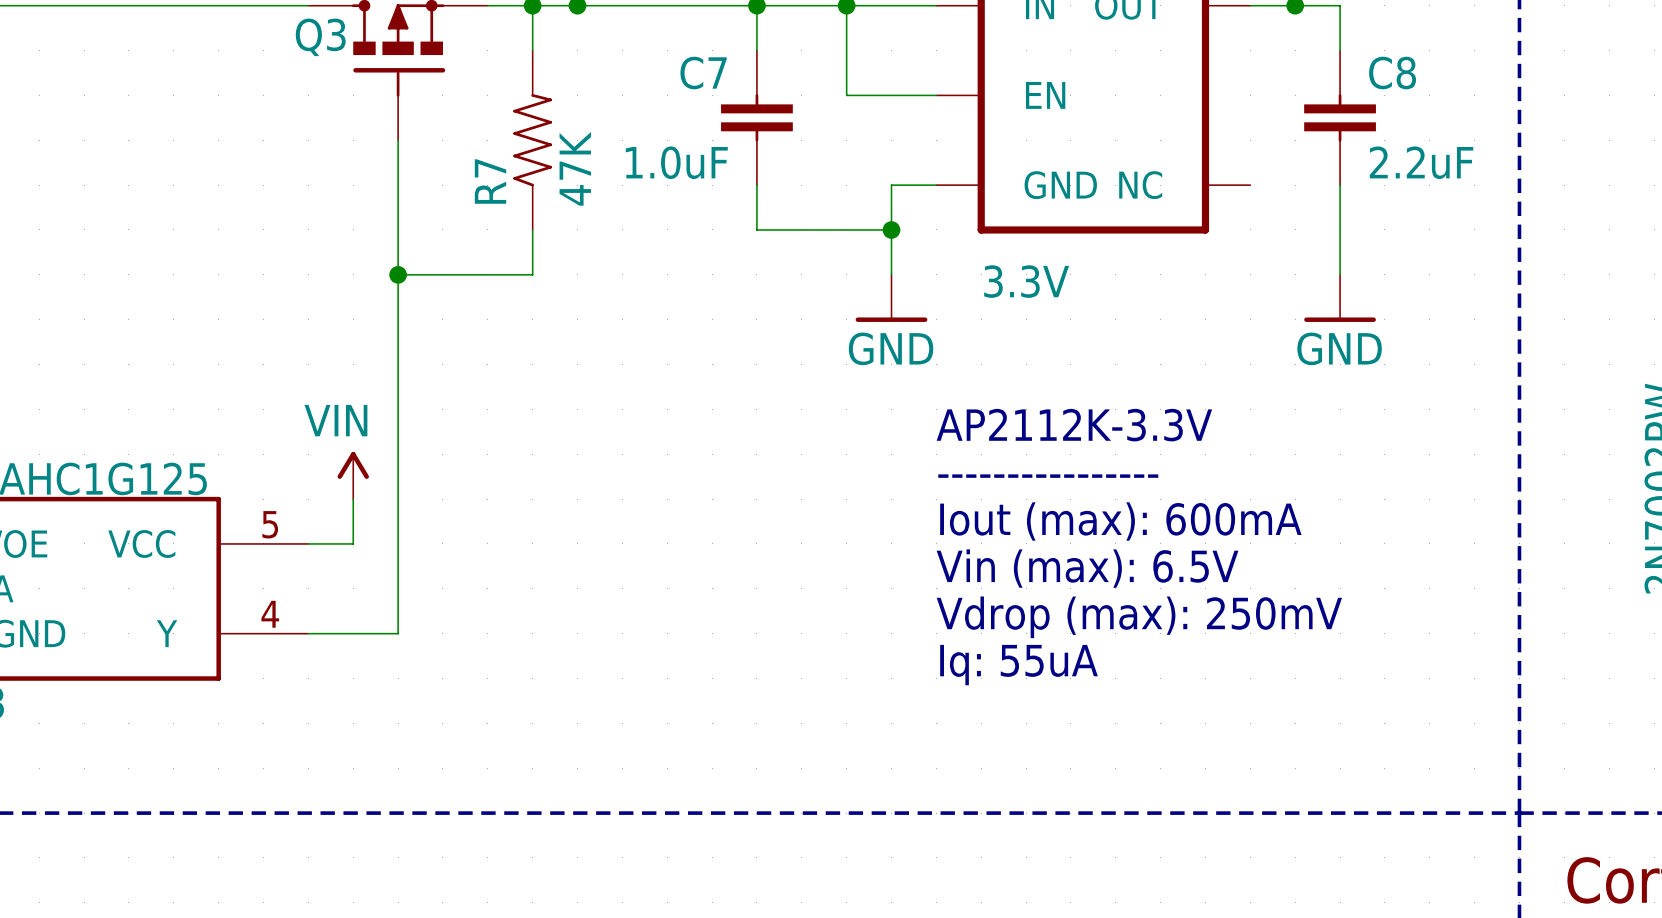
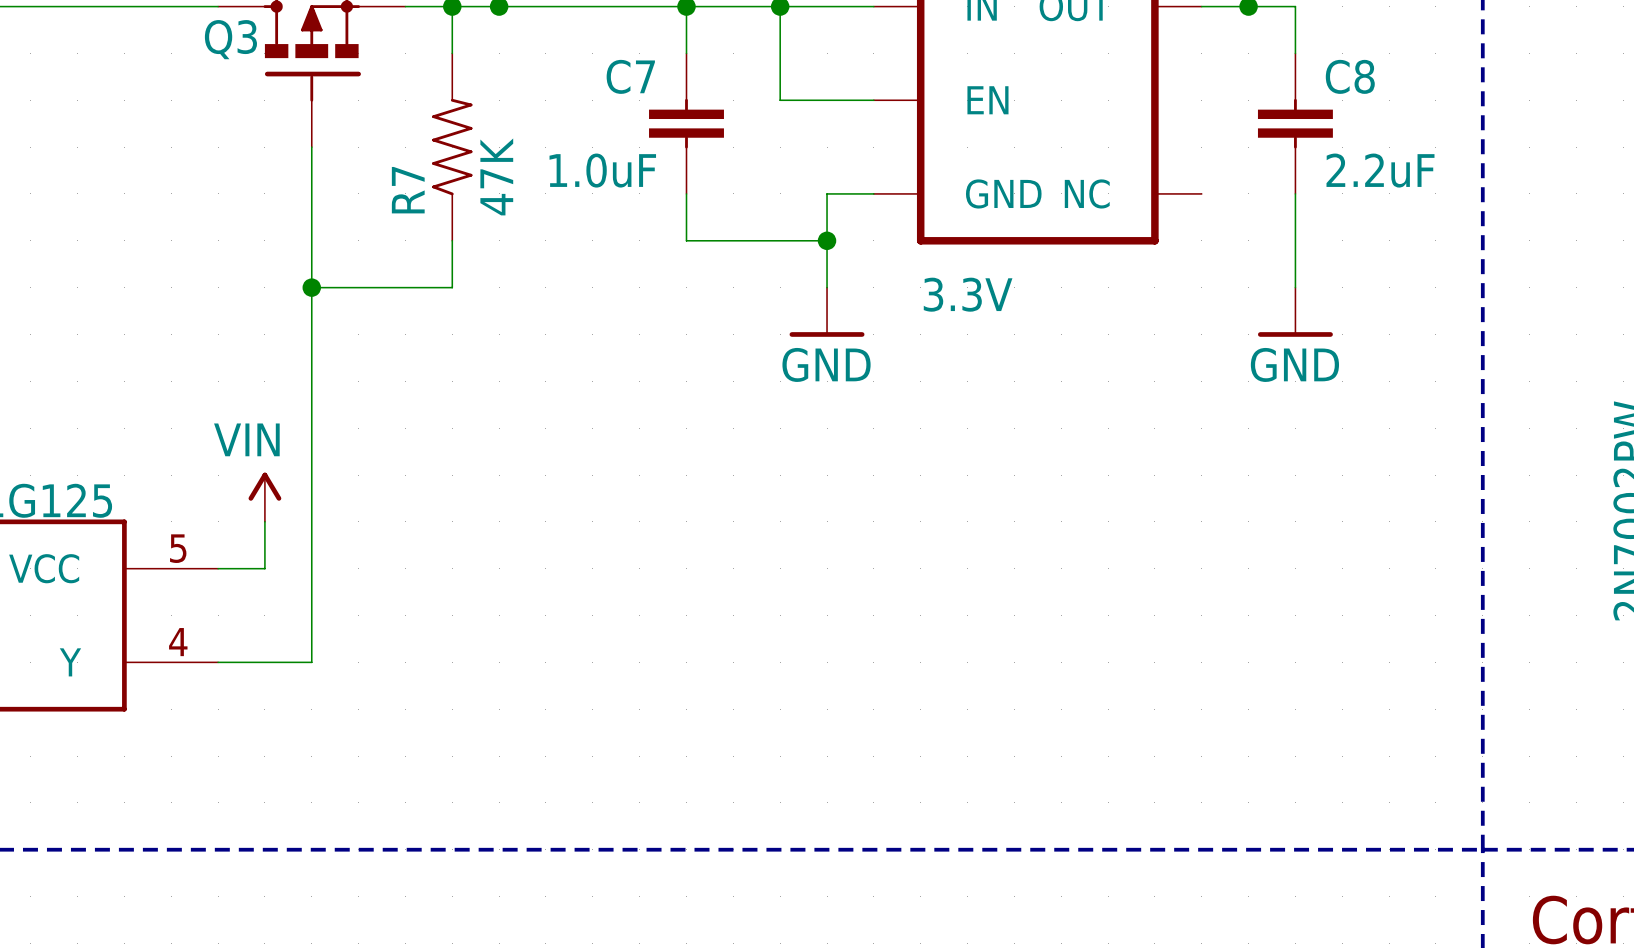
text: AP2112K-3.3V (1074, 425) -> none
text: ---------------- (1048, 476) -> none
text: Iout (max): 600mA (1120, 521) -> none
text: Vin (max): 6.5V (1087, 568) -> none
text: Vdrop (max): 250mV (1139, 617) -> none
text: Iq: 55uA (1019, 665) -> none

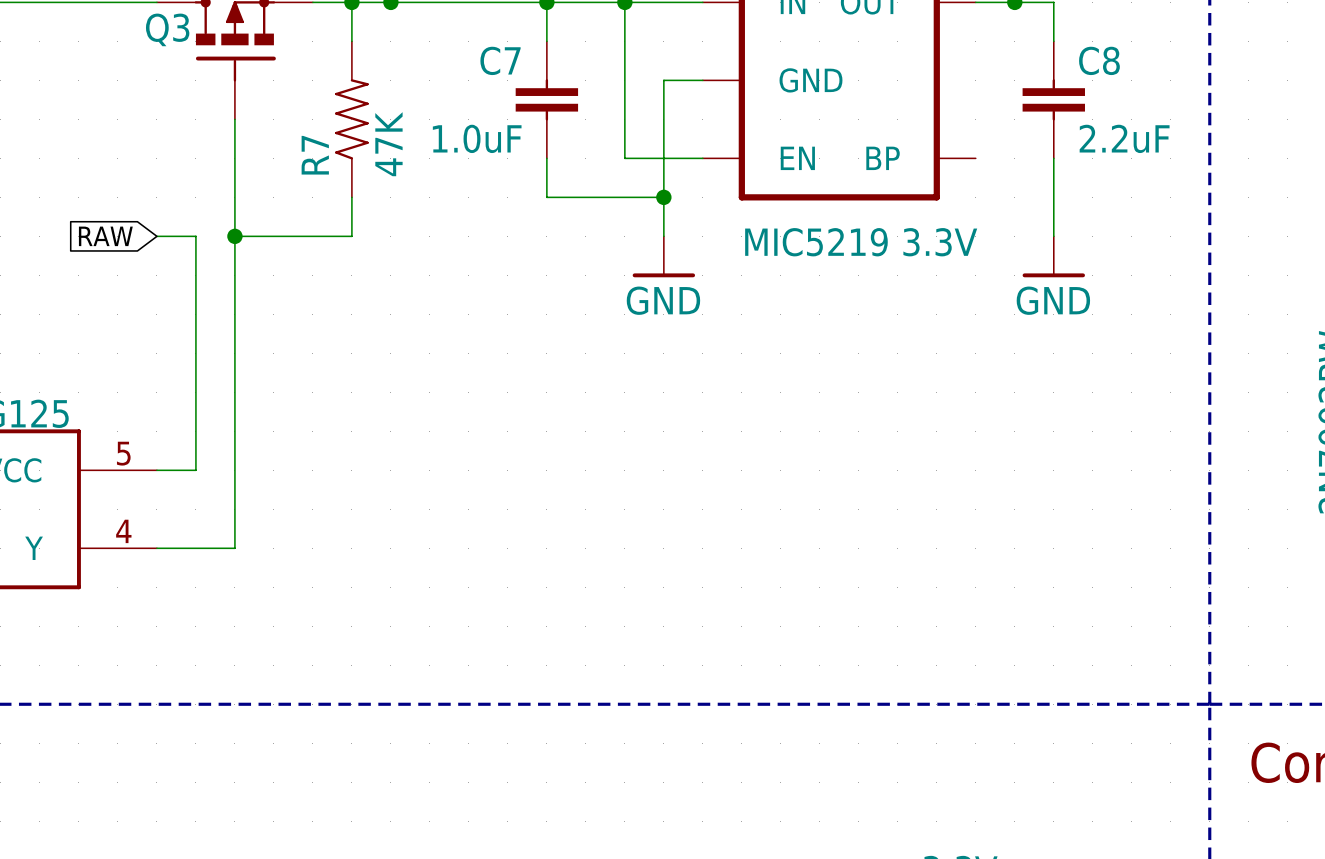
wire: (780, 100) (827, 100) -> (624, 80) (624, 158) (663, 158) (663, 80)
part pin name: EN (987, 100) -> GND (810, 80)
part pin name: GND (1003, 193) -> EN (797, 158)
part pin name: NC (1087, 193) -> BP (883, 158)
global label: none -> RAW (105, 236)
wire: none -> (156, 236) (195, 236) (195, 431)
part value: 3.3V (968, 294) -> MIC5219 3.3V (861, 242)
power symbol: VIN (264, 497) -> none

